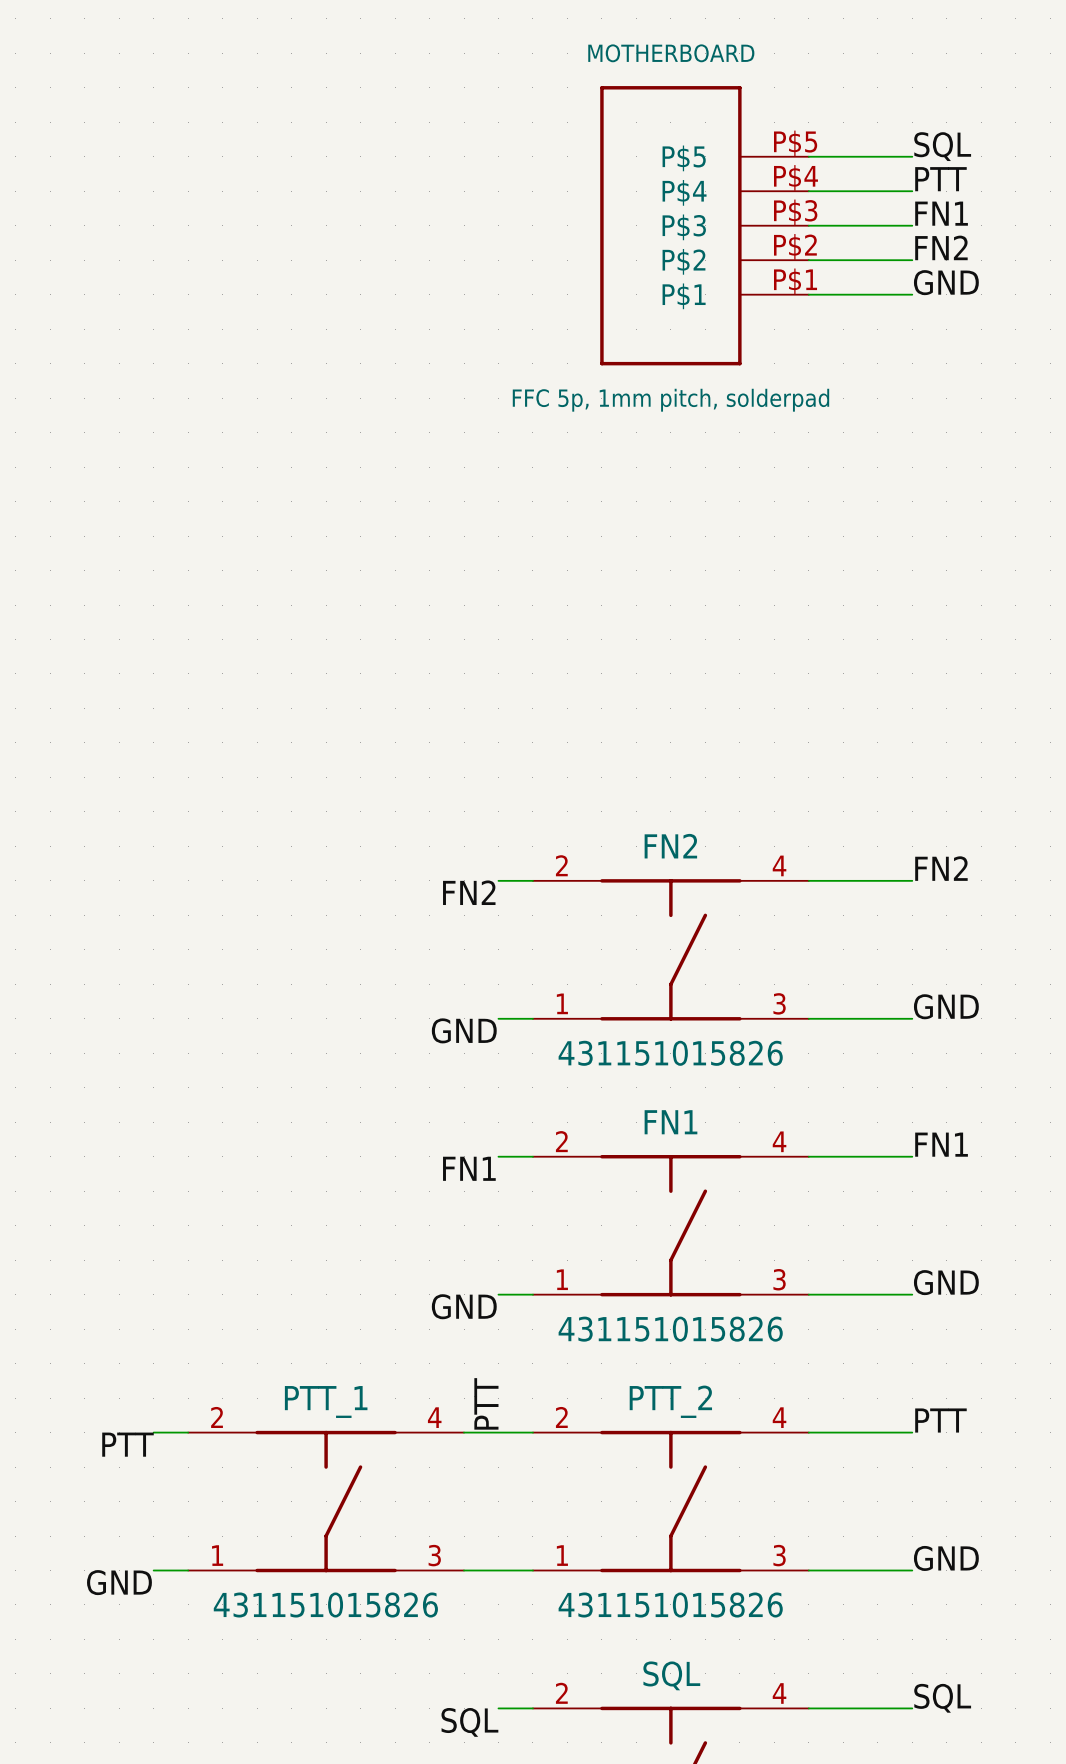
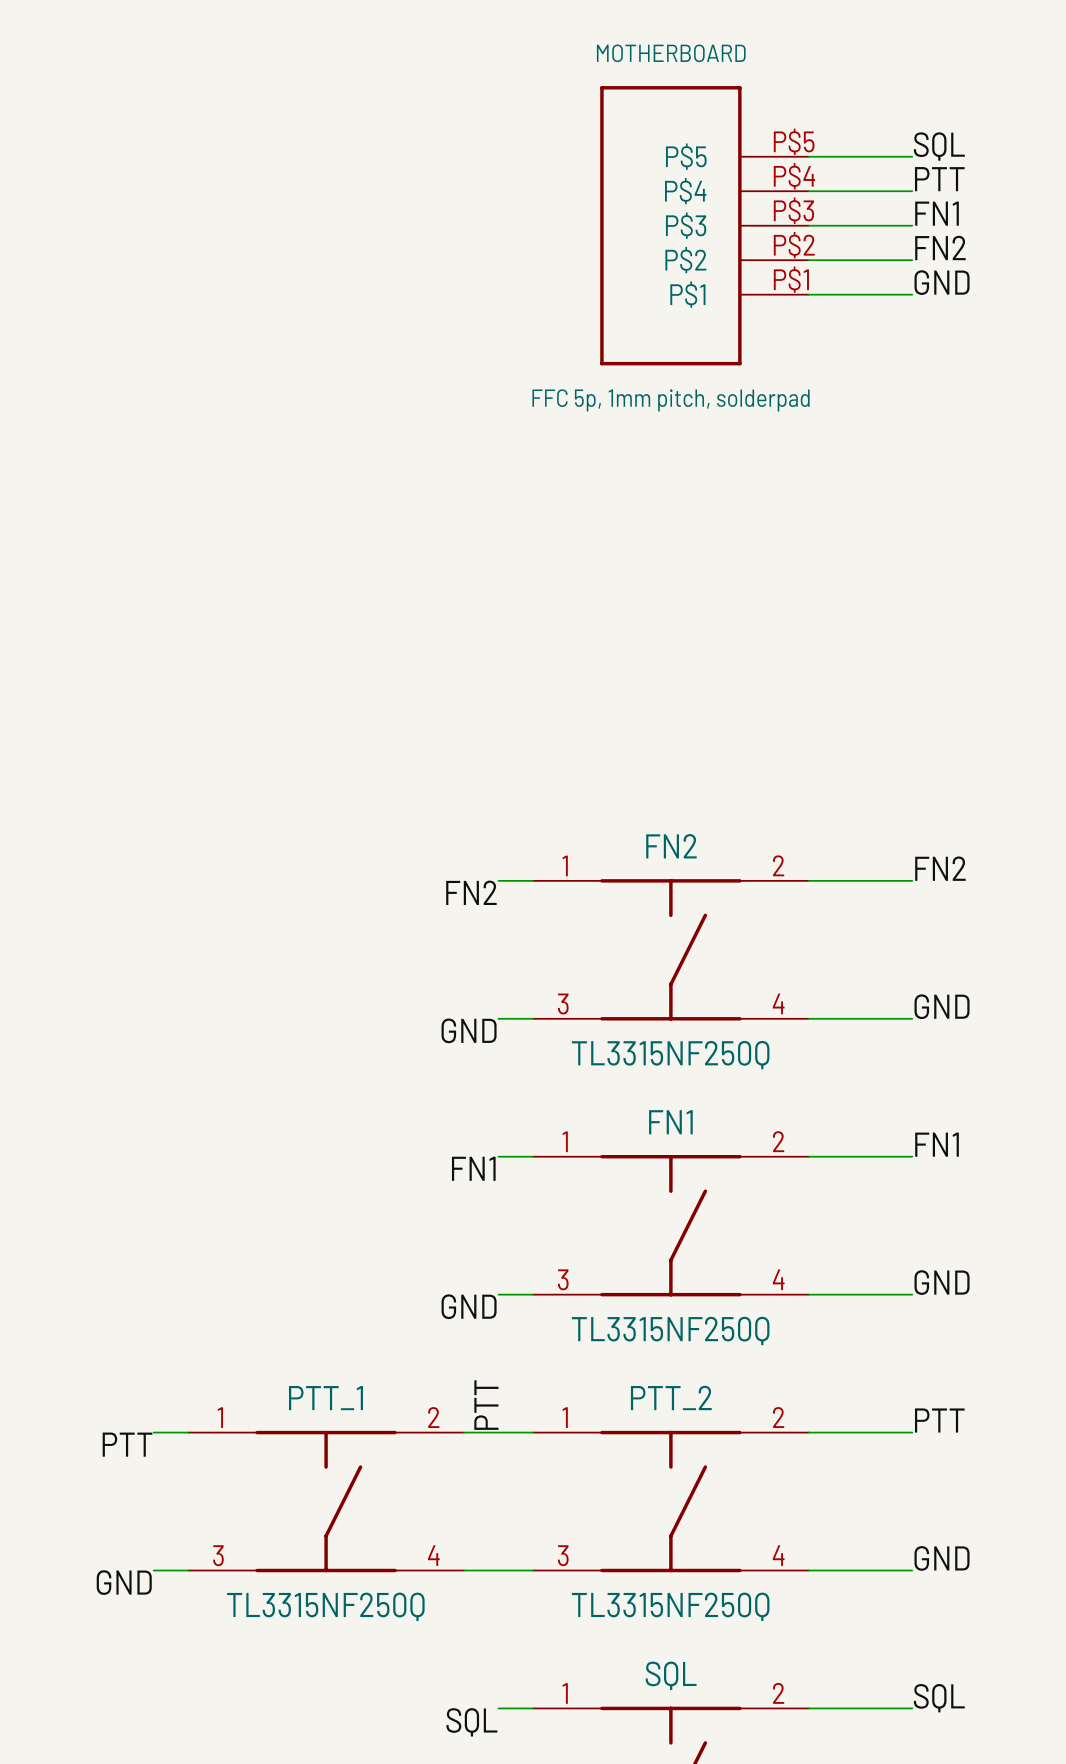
FN2 pin number: 2 (561, 865) -> 1 (565, 865)
FN2 pin number: 4 (779, 865) -> 2 (778, 865)
FN2 pin number: 1 (562, 1003) -> 3 (563, 1003)
FN2 pin number: 3 (779, 1003) -> 4 (778, 1003)
FN2 value: 431151015826 (670, 1053) -> TL3315NF250Q (670, 1055)
FN1 pin number: 2 (561, 1141) -> 1 (565, 1141)
FN1 pin number: 4 (779, 1141) -> 2 (778, 1141)
FN1 pin number: 1 (562, 1279) -> 3 (563, 1279)
FN1 pin number: 3 (779, 1279) -> 4 (778, 1279)
FN1 value: 431151015826 (670, 1329) -> TL3315NF250Q (670, 1330)
PTT_1 pin number: 2 (217, 1417) -> 1 (220, 1417)
PTT_1 pin number: 4 (434, 1417) -> 2 (433, 1417)
PTT_2 pin number: 2 (561, 1417) -> 1 (565, 1417)
PTT_2 pin number: 4 (779, 1417) -> 2 (778, 1417)
PTT_1 pin number: 1 (217, 1555) -> 3 (218, 1555)
PTT_1 pin number: 3 (434, 1555) -> 4 (433, 1555)
PTT_2 pin number: 1 (562, 1555) -> 3 (563, 1555)
PTT_2 pin number: 3 (779, 1555) -> 4 (778, 1555)
PTT_1 value: 431151015826 (325, 1605) -> TL3315NF250Q (325, 1606)
PTT_2 value: 431151015826 (670, 1605) -> TL3315NF250Q (670, 1606)
SQL pin number: 2 (561, 1693) -> 1 (565, 1693)
SQL pin number: 4 (779, 1693) -> 2 (778, 1693)

